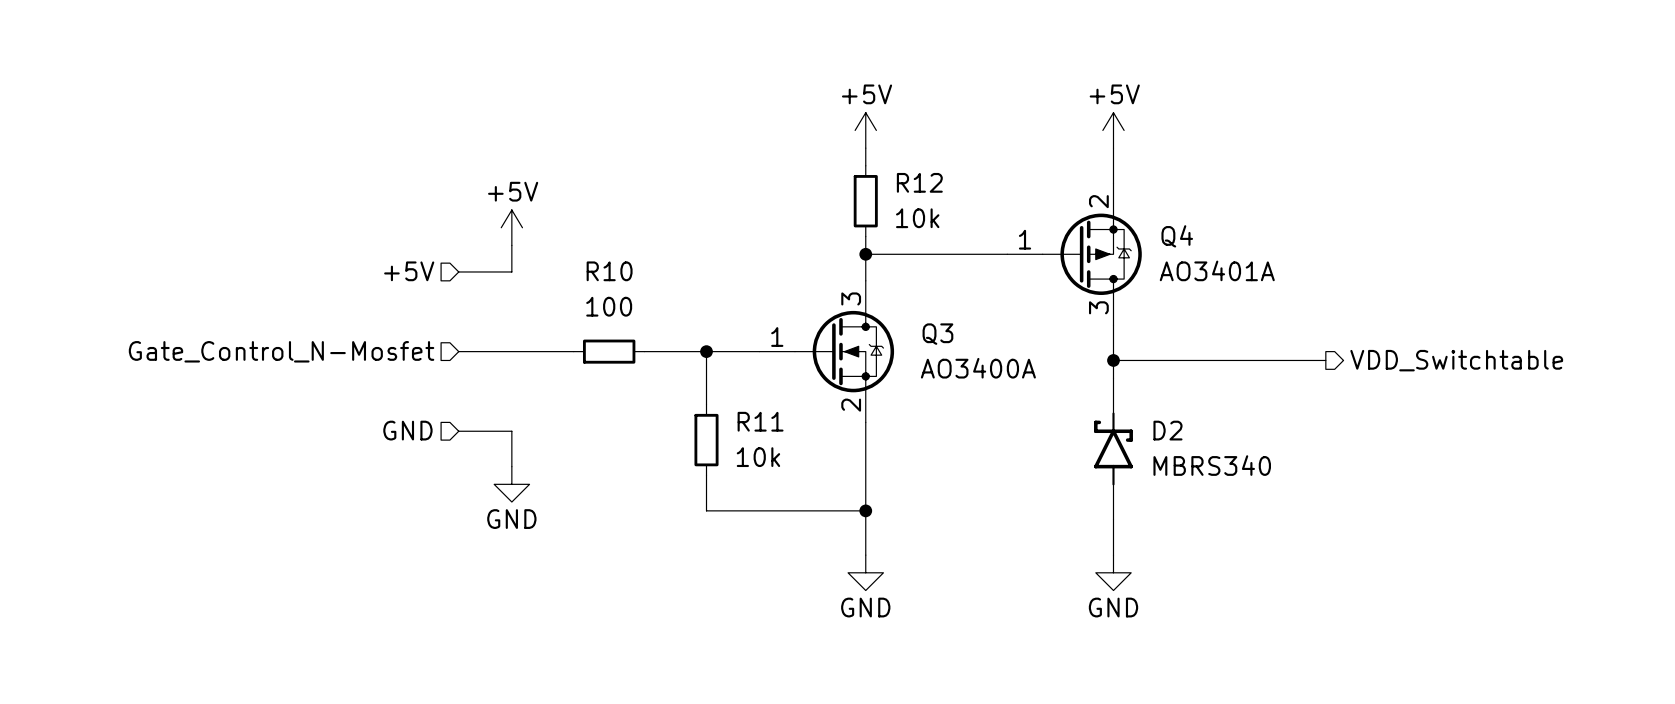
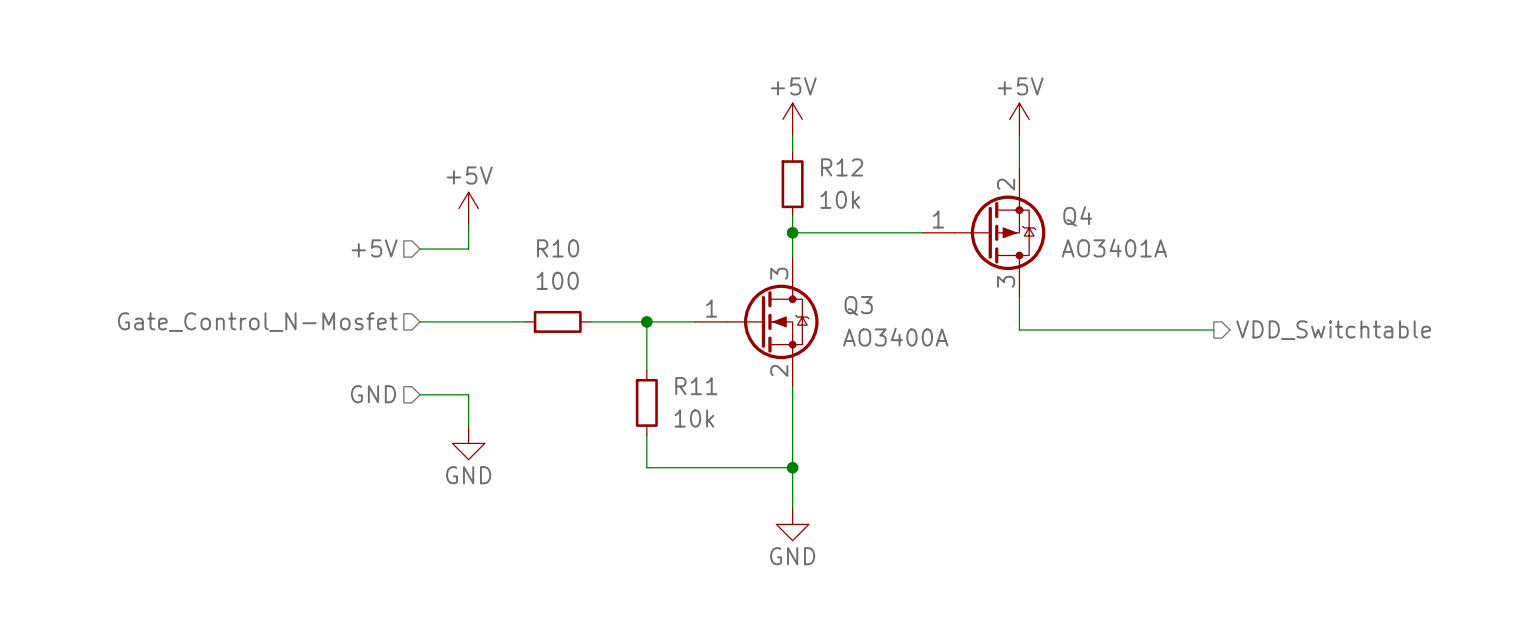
wire: (1113, 360) (1113, 378) -> none
junction: (1113, 360) -> none
D2: MBRS340 (1113, 448) -> none
wire: (1113, 519) (1113, 555) -> none
power symbol: GND (1113, 572) -> none

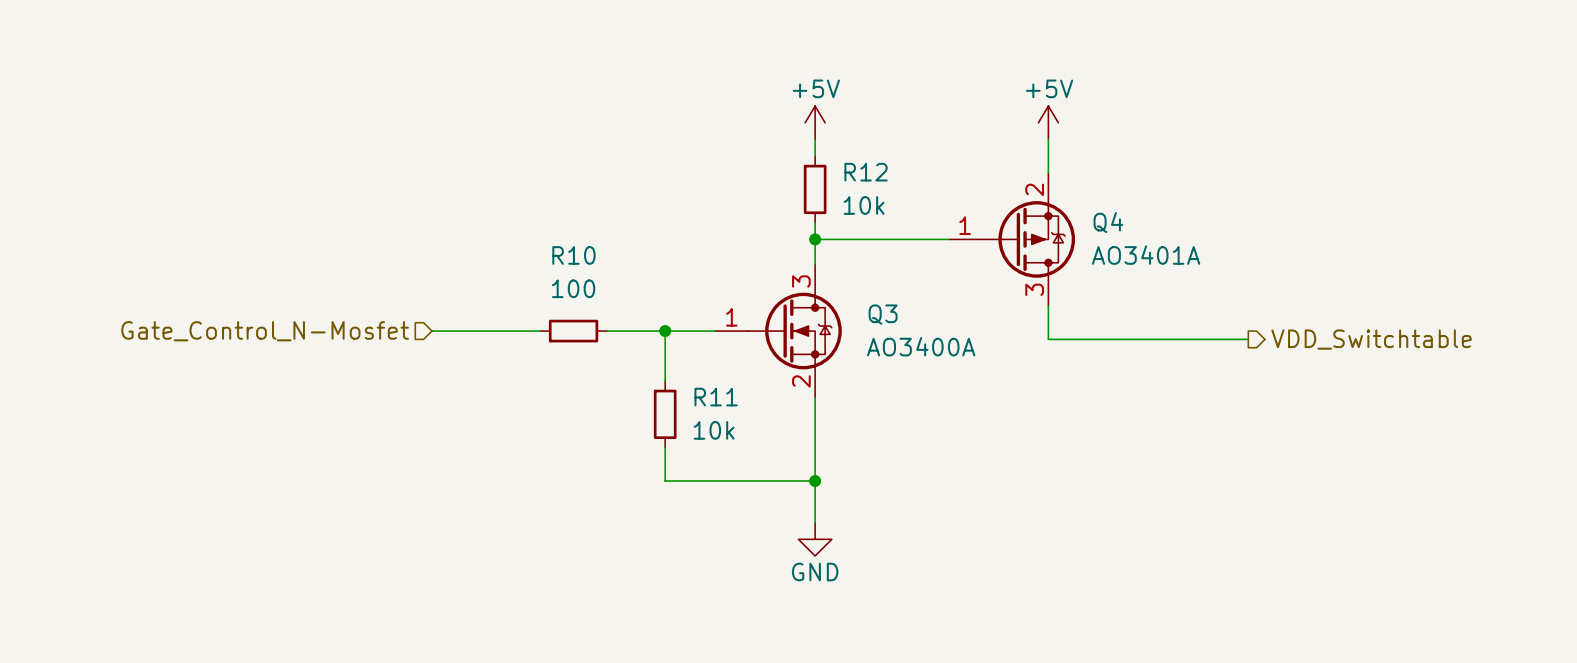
power symbol: +5V (468, 208) -> none
wire: (468, 224) (468, 249) (420, 249) -> none
hierarchical label: +5V (374, 248) -> none
hierarchical label: GND (373, 394) -> none
wire: (420, 394) (468, 394) (468, 427) -> none
power symbol: GND (468, 443) -> none

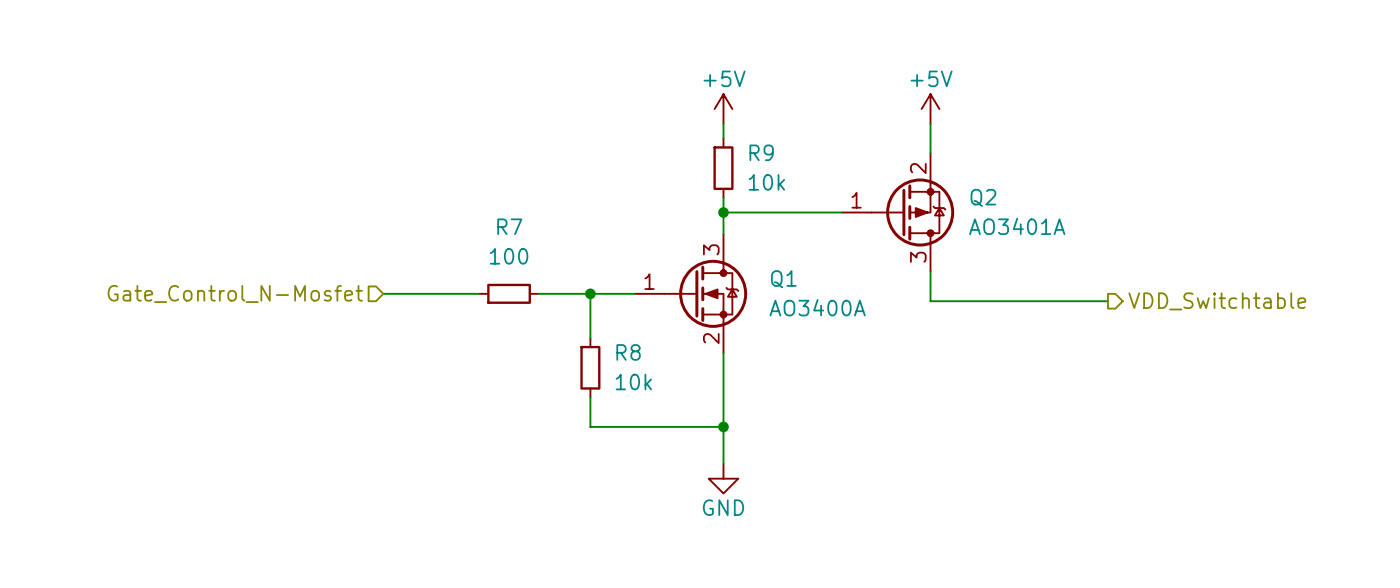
R12 name: R12 (866, 172) -> R9 (761, 152)
Q4 name: Q4 (1108, 222) -> Q2 (983, 197)
R10 name: R10 (573, 255) -> R7 (509, 226)
Q3 name: Q3 (883, 314) -> Q1 (783, 279)
R11 name: R11 (716, 397) -> R8 (628, 352)

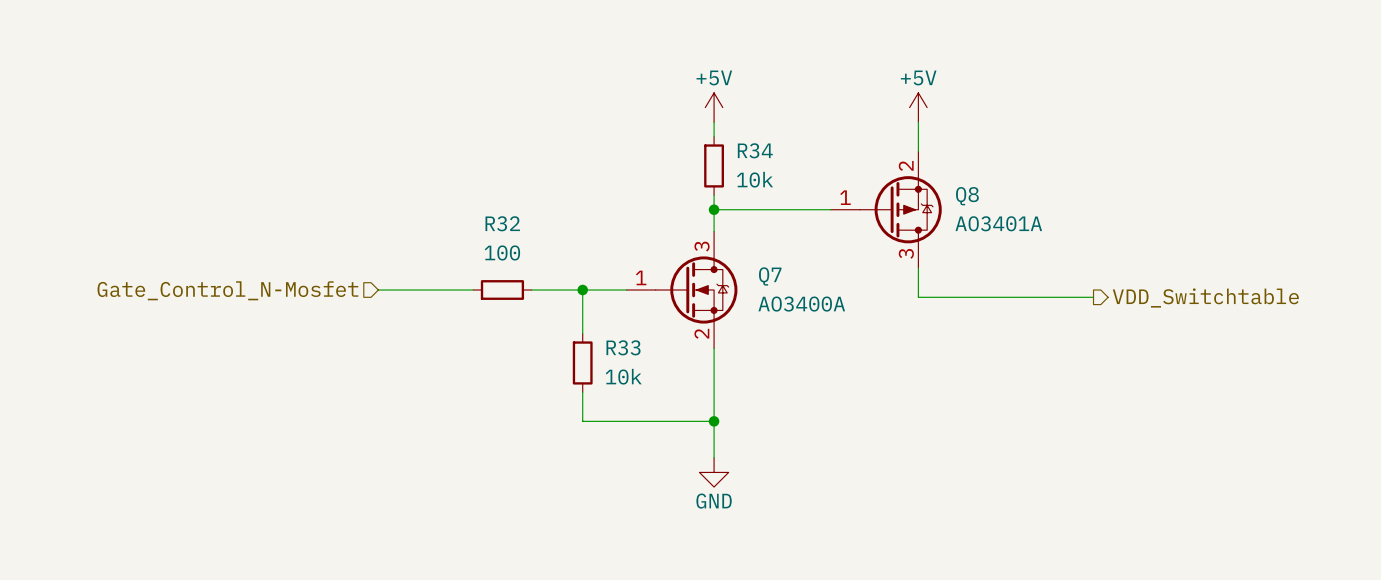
R9 name: R9 (761, 152) -> R34 (755, 150)
Q2 name: Q2 (983, 197) -> Q8 (967, 196)
R7 name: R7 (509, 226) -> R32 (502, 223)
Q1 name: Q1 (783, 279) -> Q7 (770, 276)
R8 name: R8 (628, 352) -> R33 (623, 347)

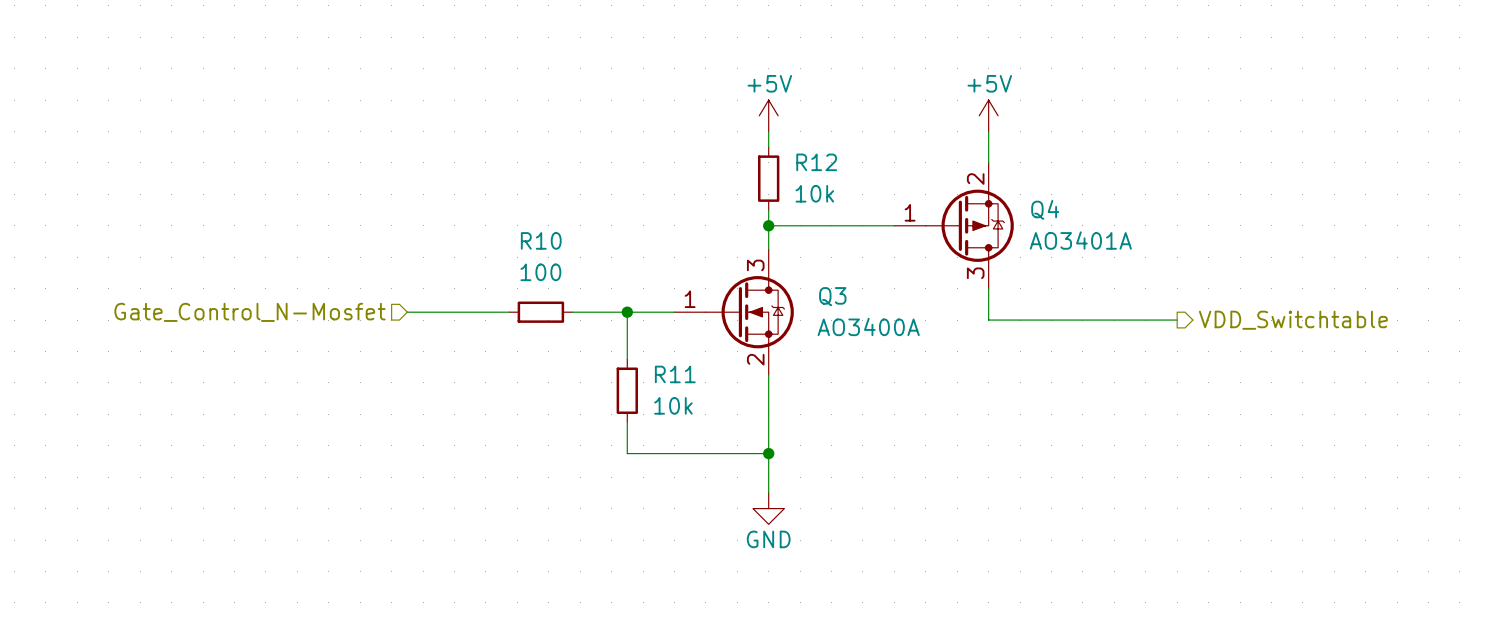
R34 name: R34 (755, 150) -> R12 (816, 162)
Q8 name: Q8 (967, 196) -> Q4 (1045, 209)
R32 name: R32 (502, 223) -> R10 (541, 240)
Q7 name: Q7 (770, 276) -> Q3 (832, 296)
R33 name: R33 (623, 347) -> R11 (675, 374)

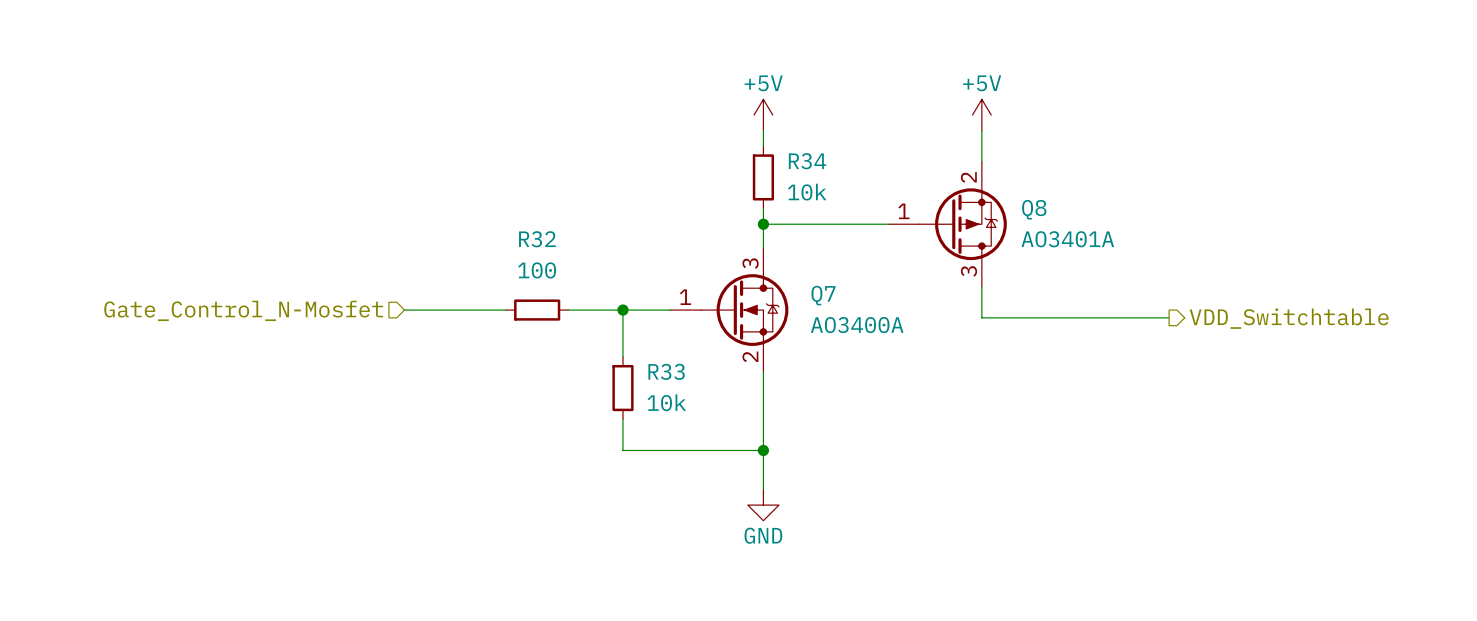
R12 name: R12 (816, 162) -> R34 (807, 161)
Q4 name: Q4 (1045, 209) -> Q8 (1034, 209)
R10 name: R10 (541, 240) -> R32 (537, 239)
Q3 name: Q3 (832, 296) -> Q7 (823, 295)
R11 name: R11 (675, 374) -> R33 (666, 371)

